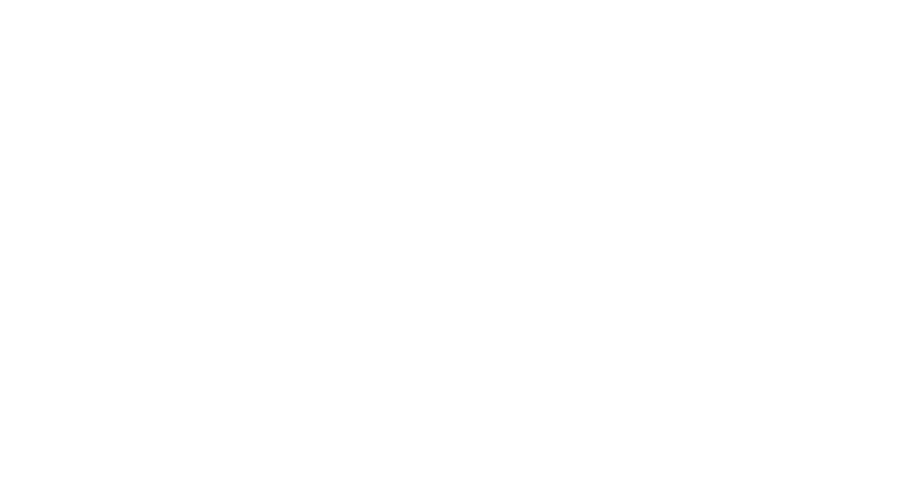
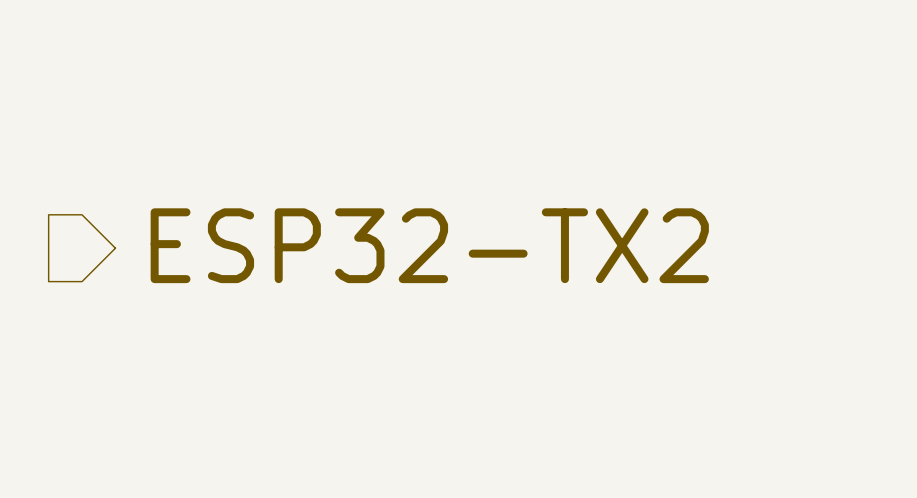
hierarchical label: none -> ESP32-TX2 (429, 245)

